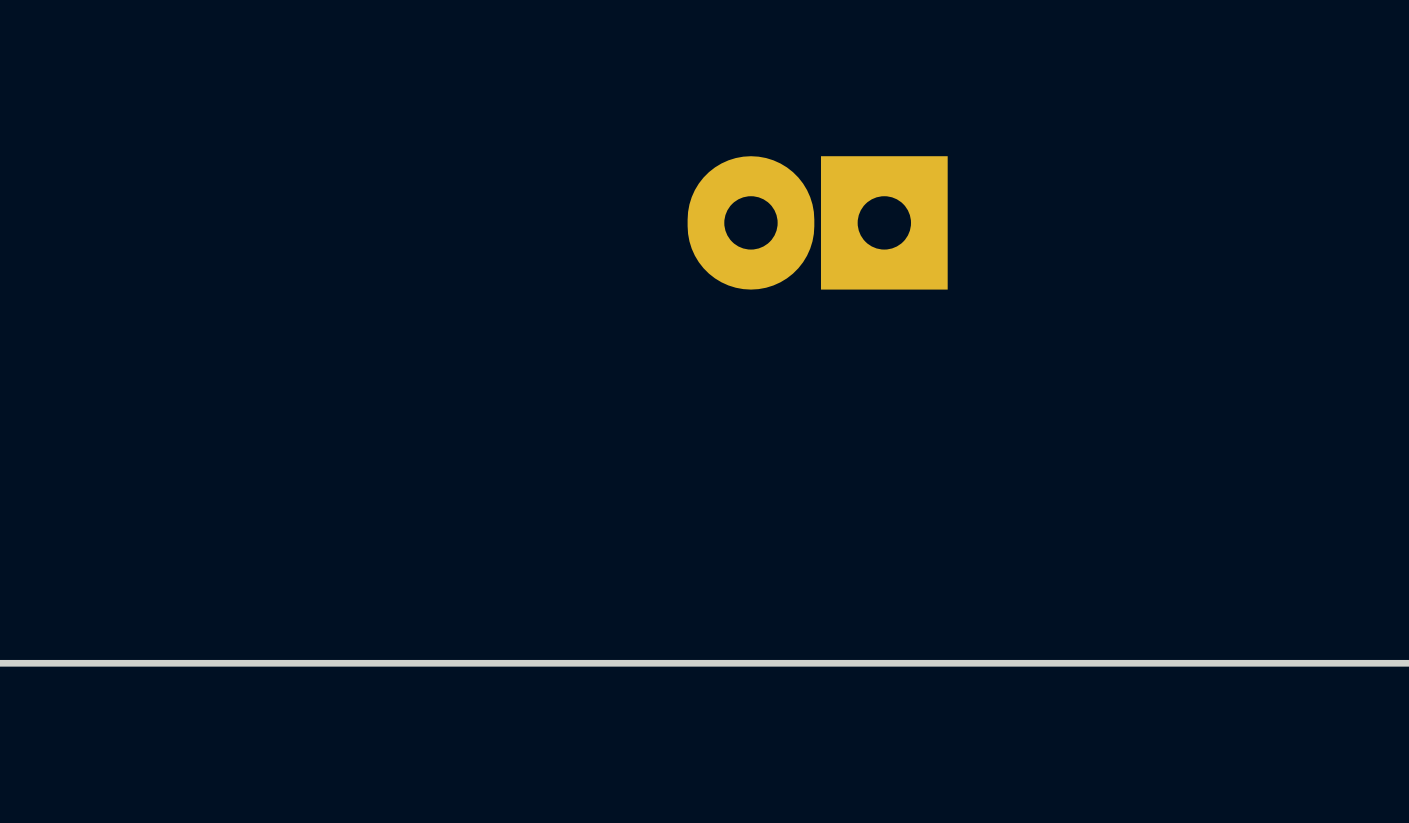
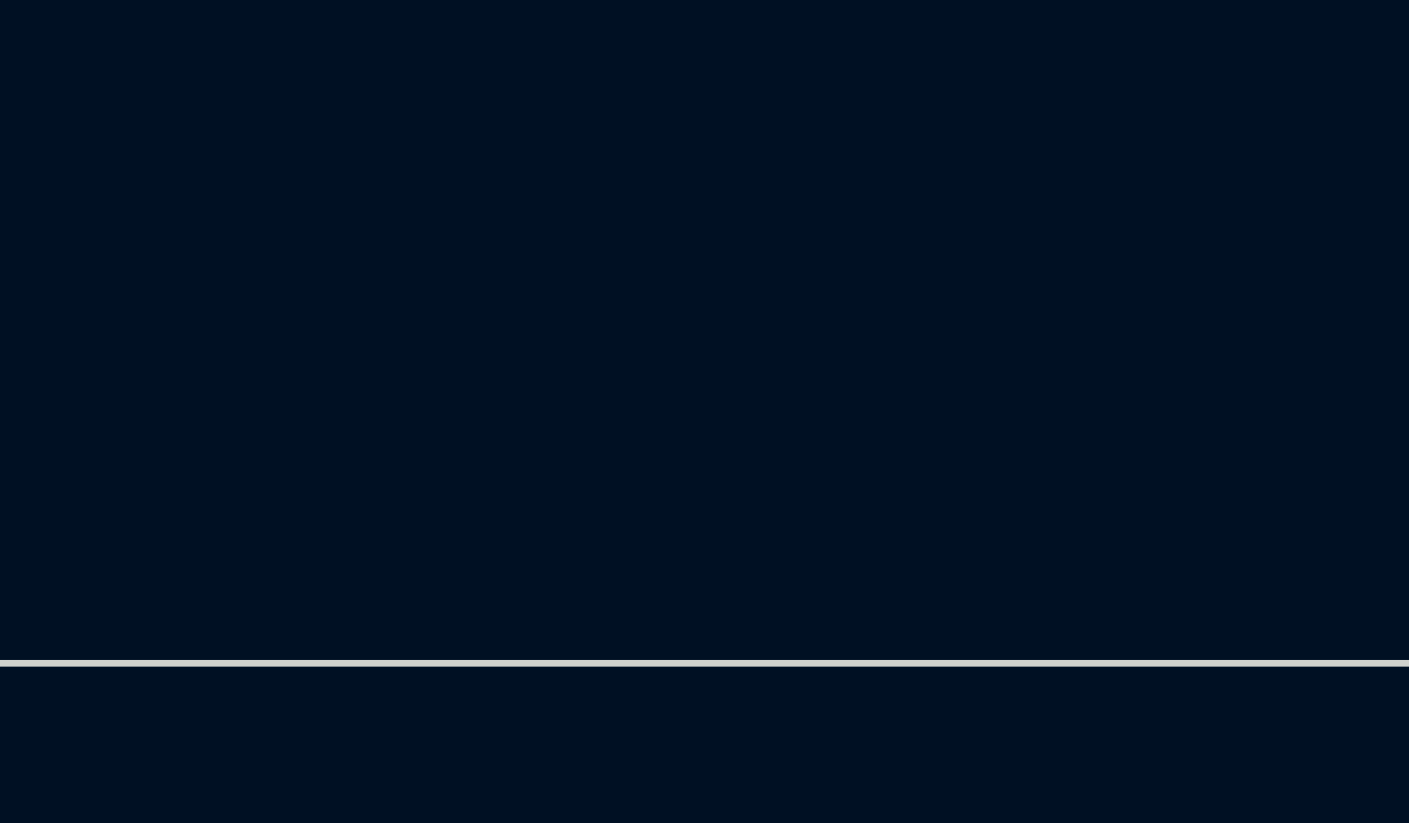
part: (817, 222) -> none

